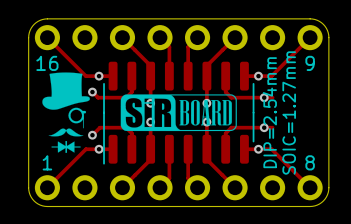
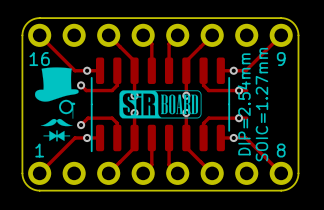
drawing shape: [120, 94, 237, 132] -> [119, 90, 202, 119]

